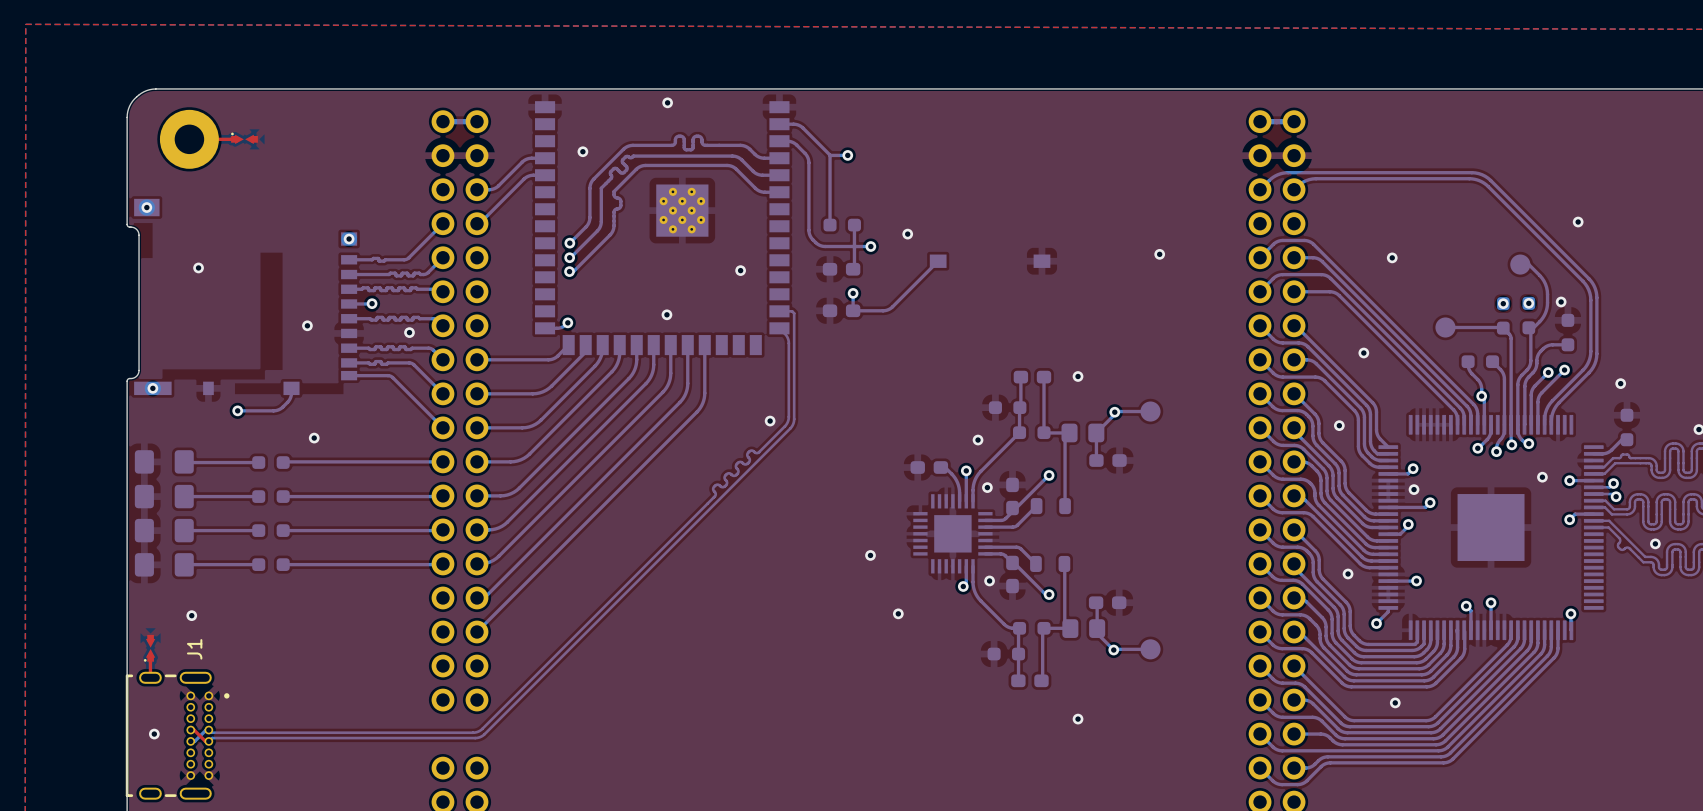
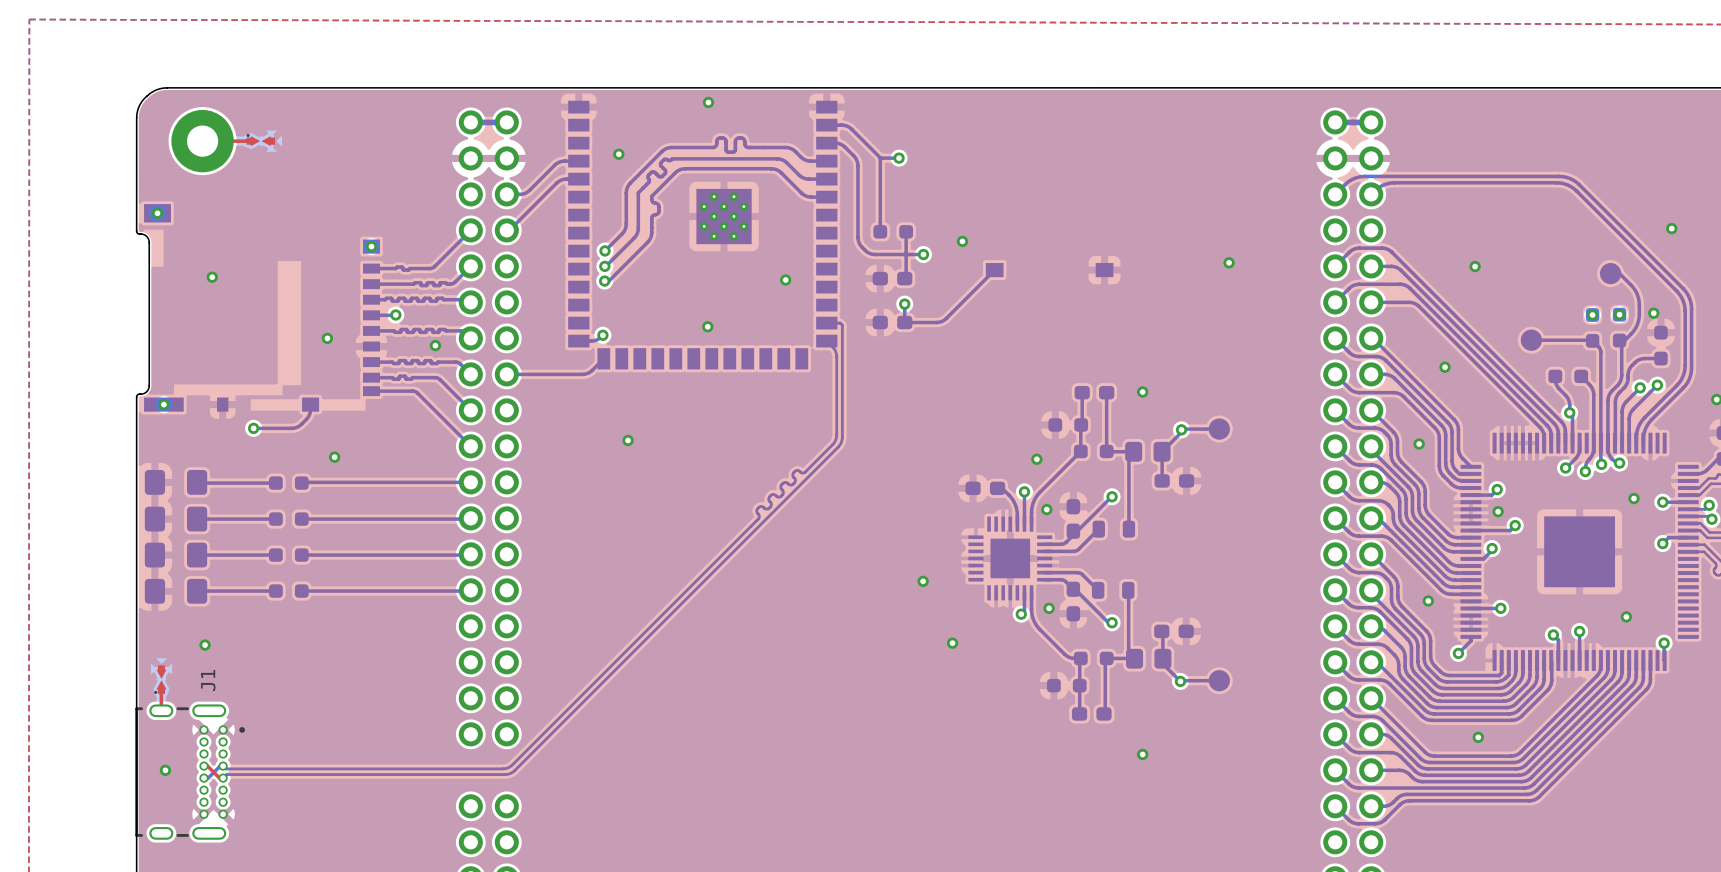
bottom track: (585, 345) (585, 352) (551, 385) (543, 391) (532, 393) (477, 393) -> none
bottom track: (602, 345) (601, 355) (596, 364) (535, 424) (522, 427) (477, 427) -> none
bottom track: (619, 345) (619, 358) (613, 369) (526, 456) (514, 461) (477, 461) -> none
bottom track: (636, 345) (636, 364) (630, 376) (519, 488) (503, 495) (477, 495) -> none
bottom track: (653, 345) (653, 369) (645, 383) (504, 524) (492, 529) (477, 529) -> none
bottom track: (670, 345) (670, 375) (664, 390) (498, 556) (490, 561) (477, 563) -> none
bottom track: (687, 345) (687, 386) (681, 400) (484, 597) (477, 597) -> none
bottom track: (704, 345) (704, 395) (698, 410) (477, 631) -> none
via: (770, 421) -> none
via: none -> (628, 440)
via: none -> (1626, 616)

